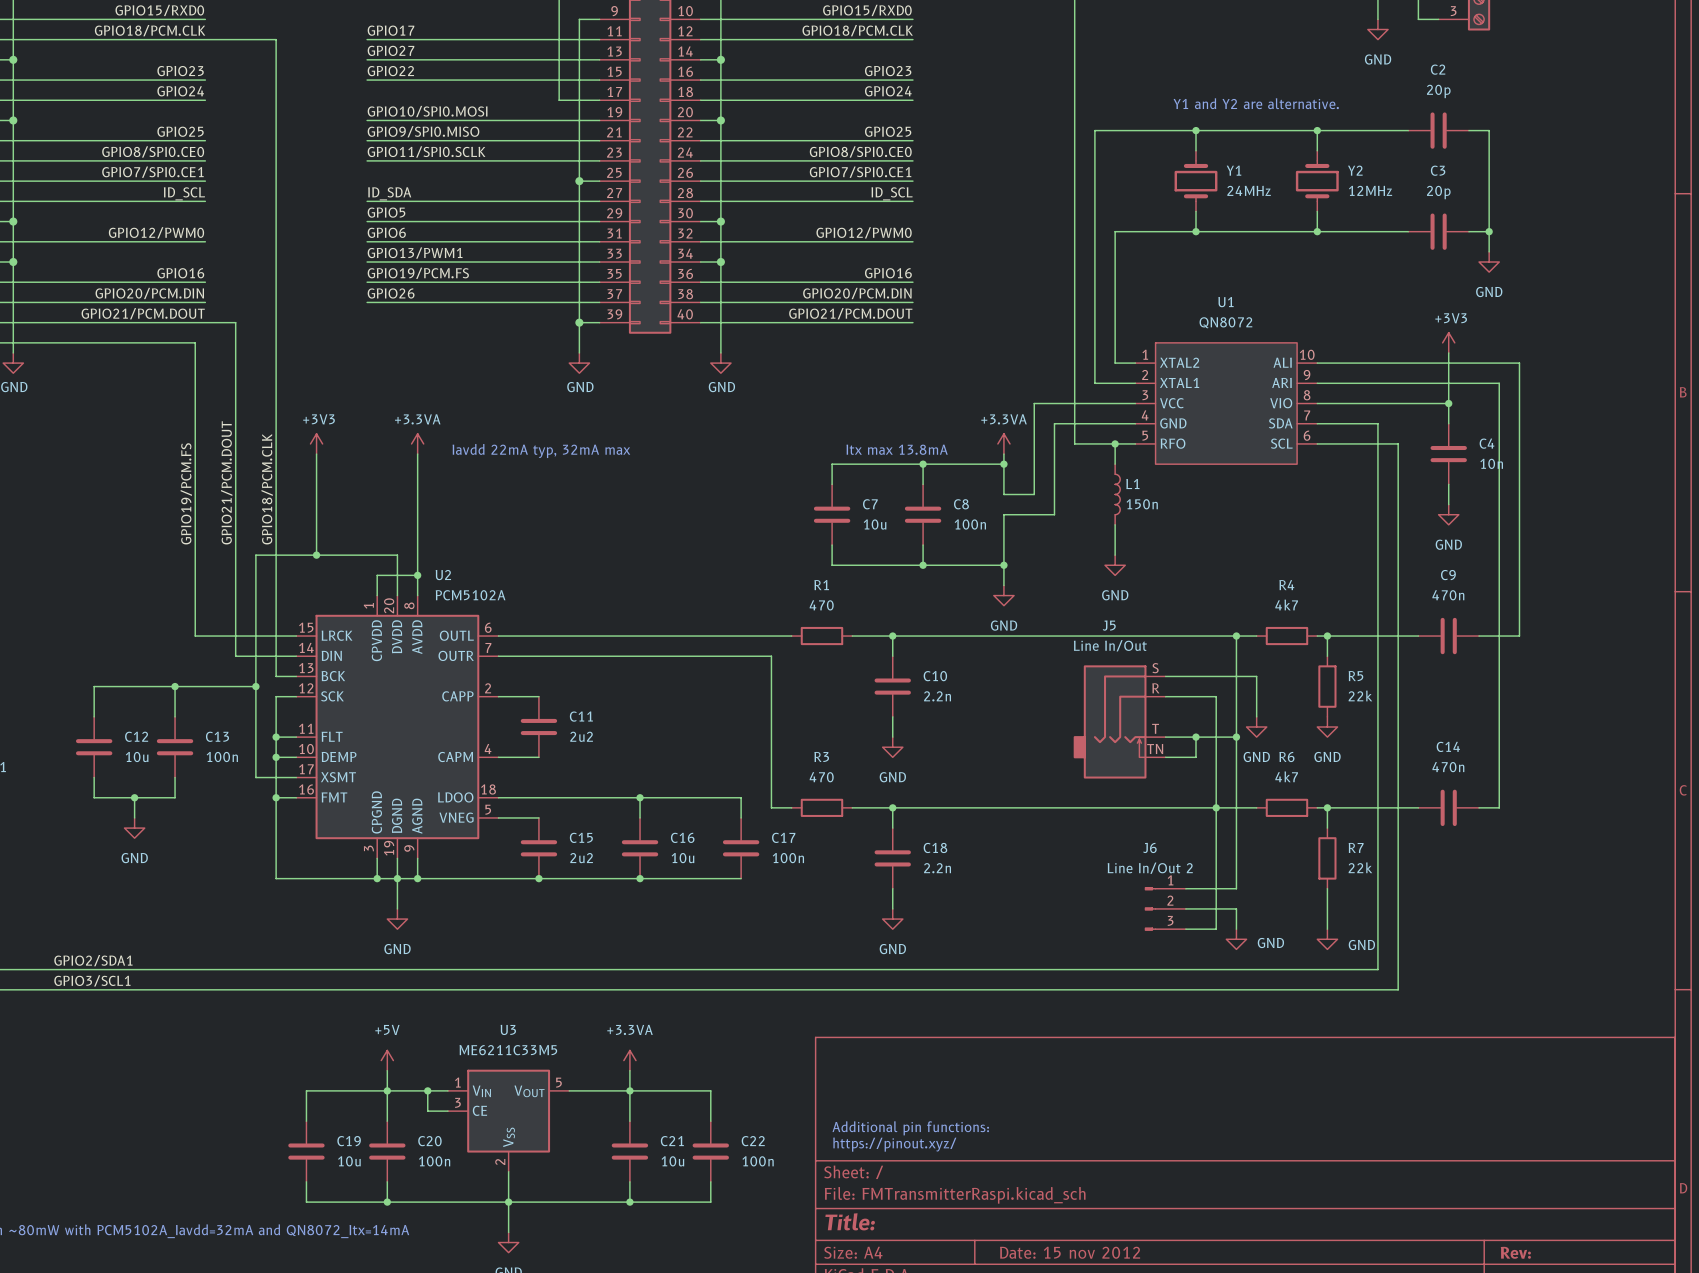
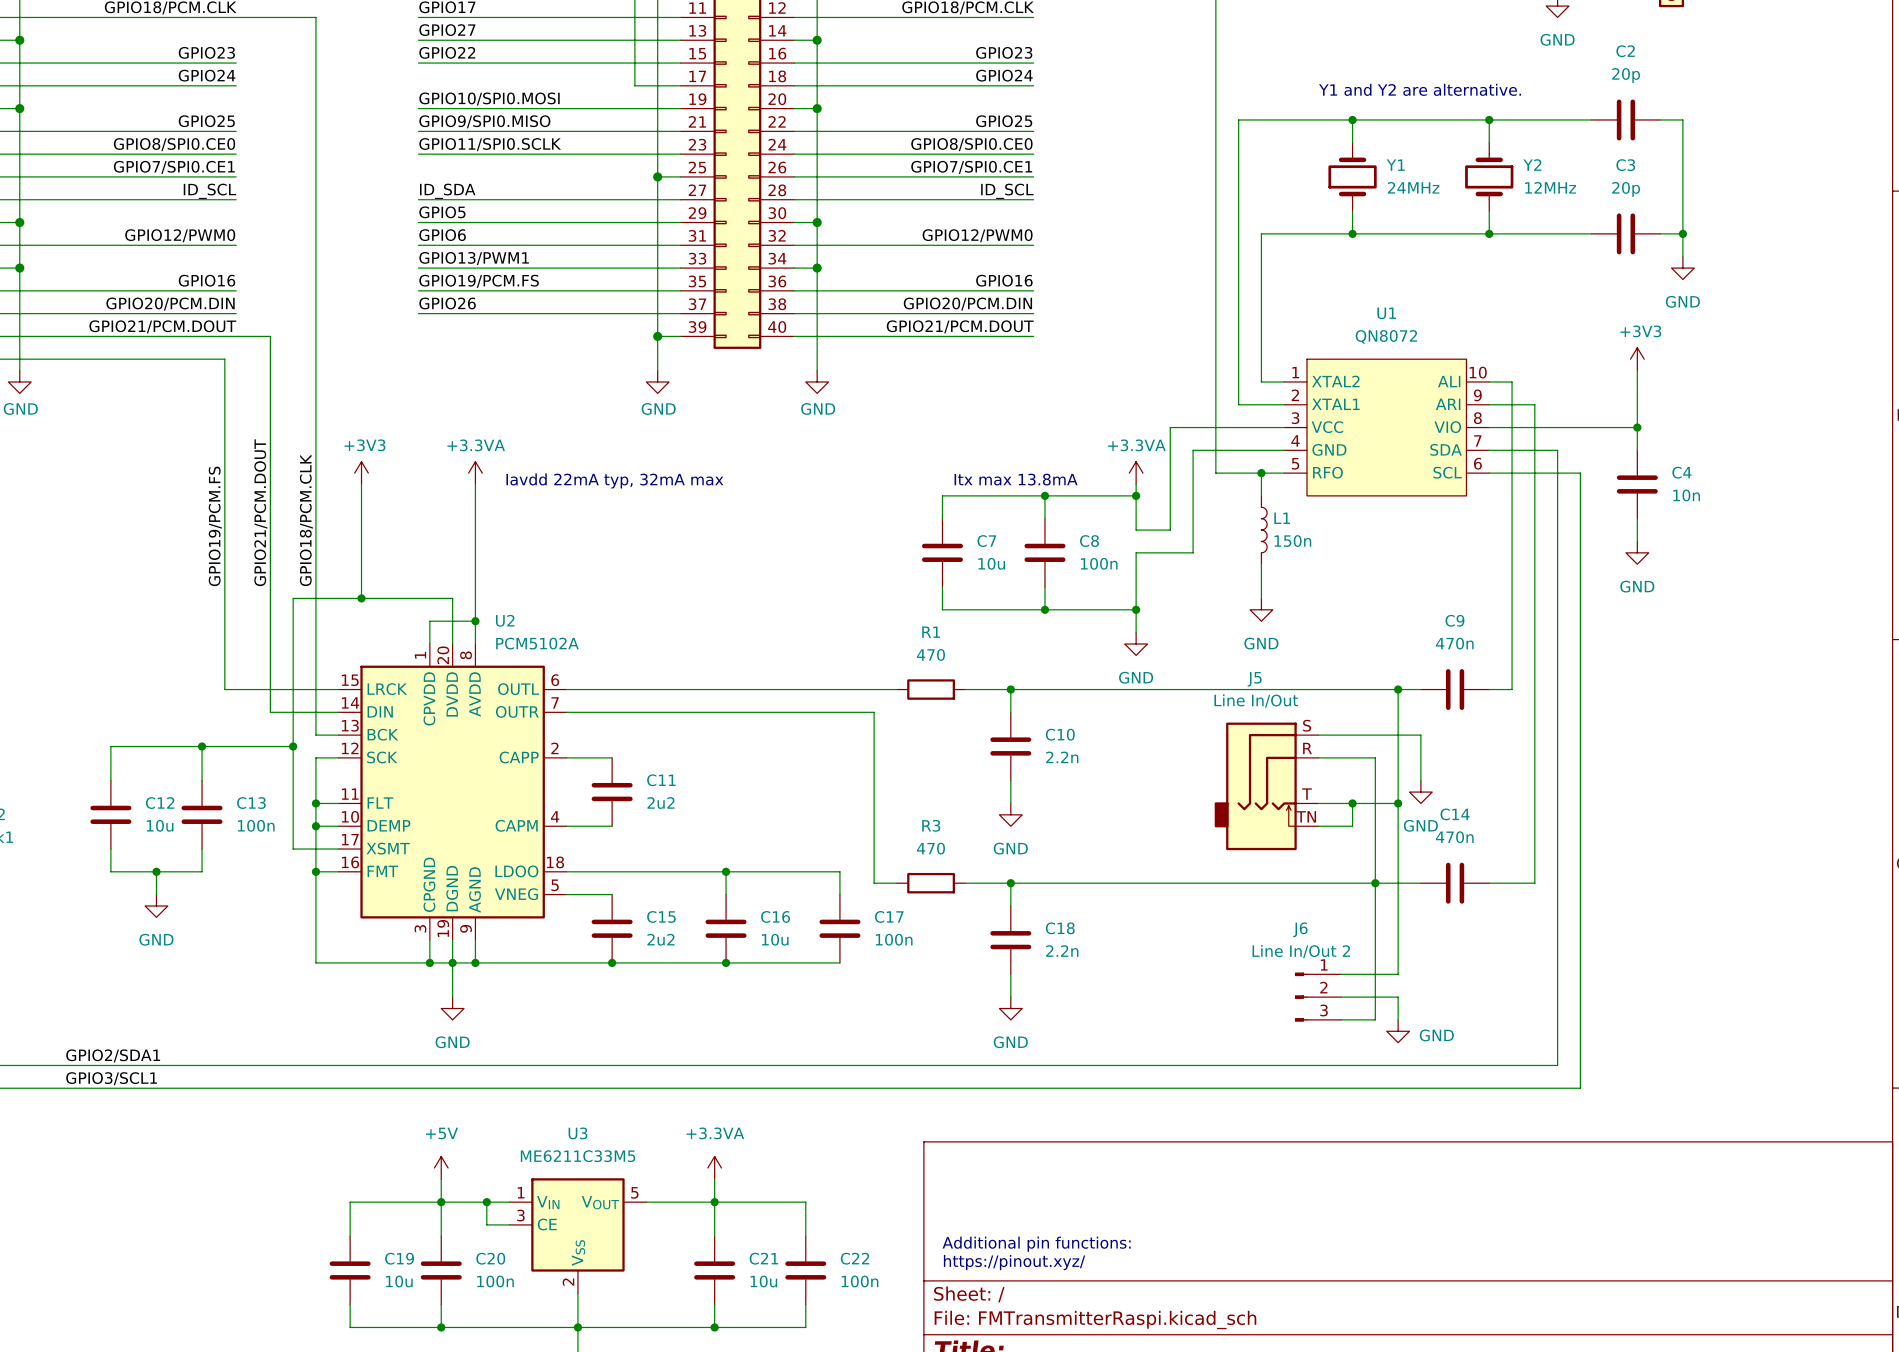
wire: (1337, 363) (1519, 363) (1519, 636) (1479, 636) -> (1512, 381) (1512, 689)
wire: (1357, 383) (1499, 383) (1499, 807) (1479, 807) -> (1534, 404) (1534, 883)
R4: 4k7 (1286, 636) -> none
wire: (1327, 636) (1327, 656) -> none
junction: (1327, 636) -> none
wire: (1337, 636) (1418, 636) -> none
C9 position: (1448, 636) -> (1455, 689)
R5: 22k (1327, 686) -> none
power symbol: GND (1327, 727) -> none
R6: 4k7 (1286, 807) -> none
wire: (1327, 807) (1327, 828) -> none
junction: (1327, 807) -> none
wire: (1357, 807) (1418, 807) -> none
C14 position: (1448, 807) -> (1455, 883)
R7: 22k (1327, 858) -> none
wire: (1327, 888) (1327, 929) -> none
power symbol: GND (1327, 939) -> none

